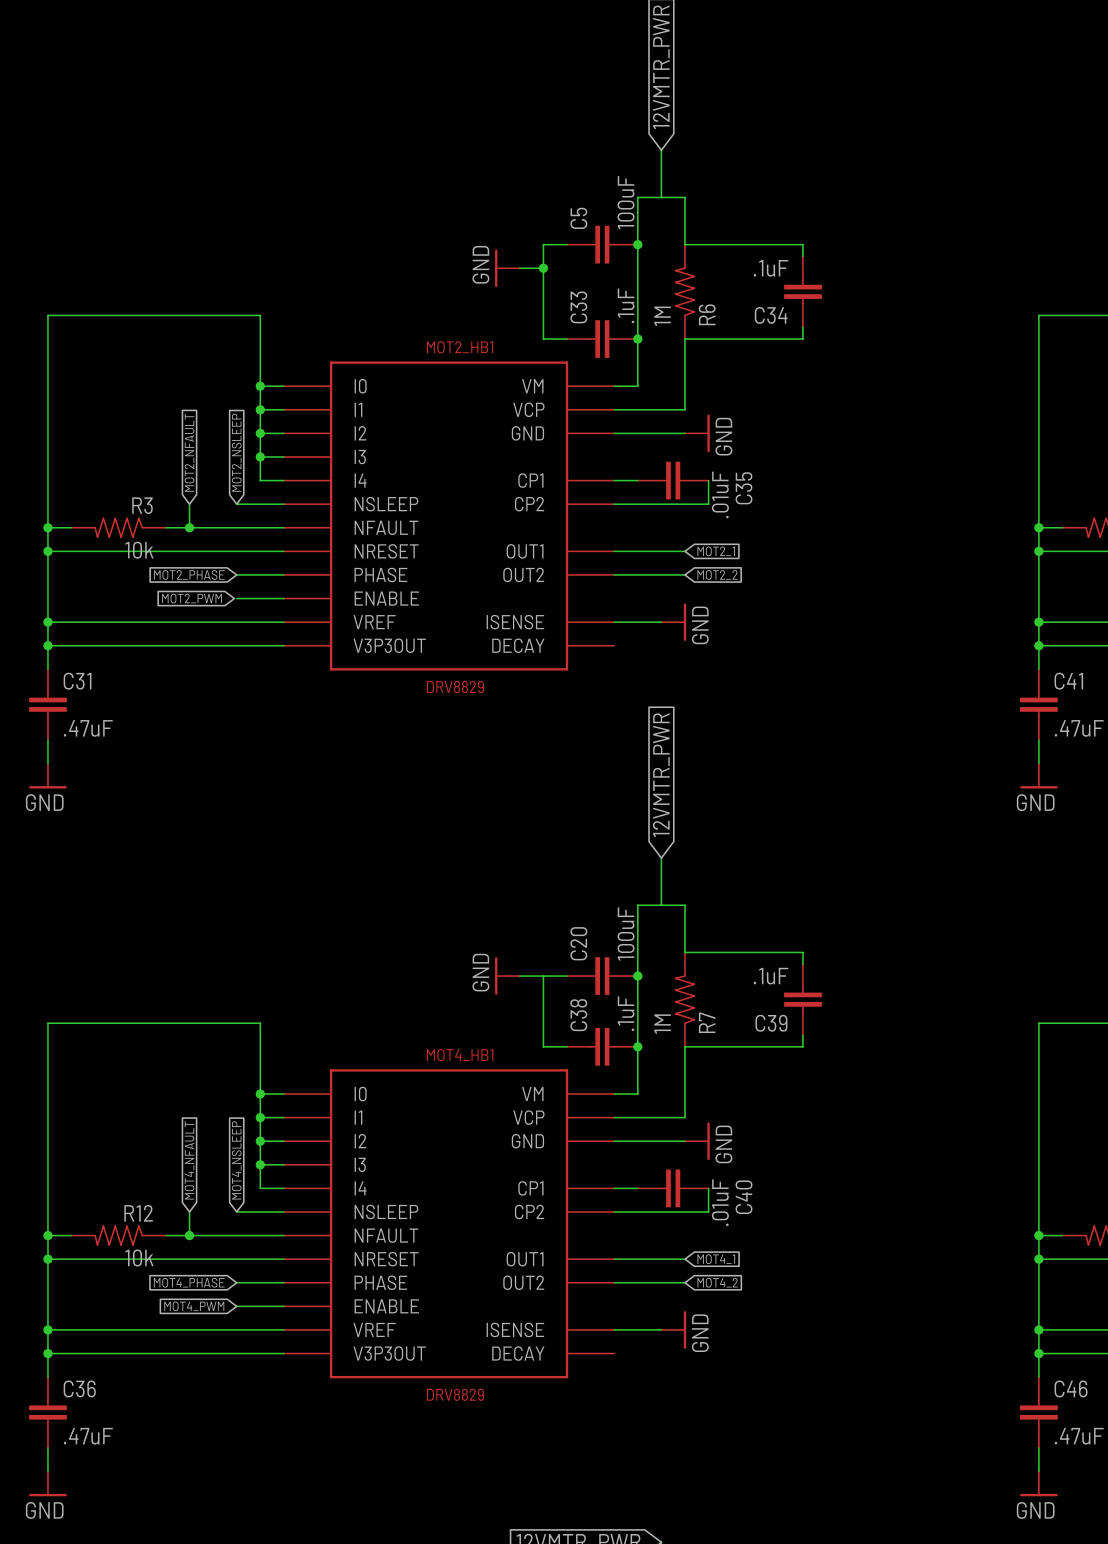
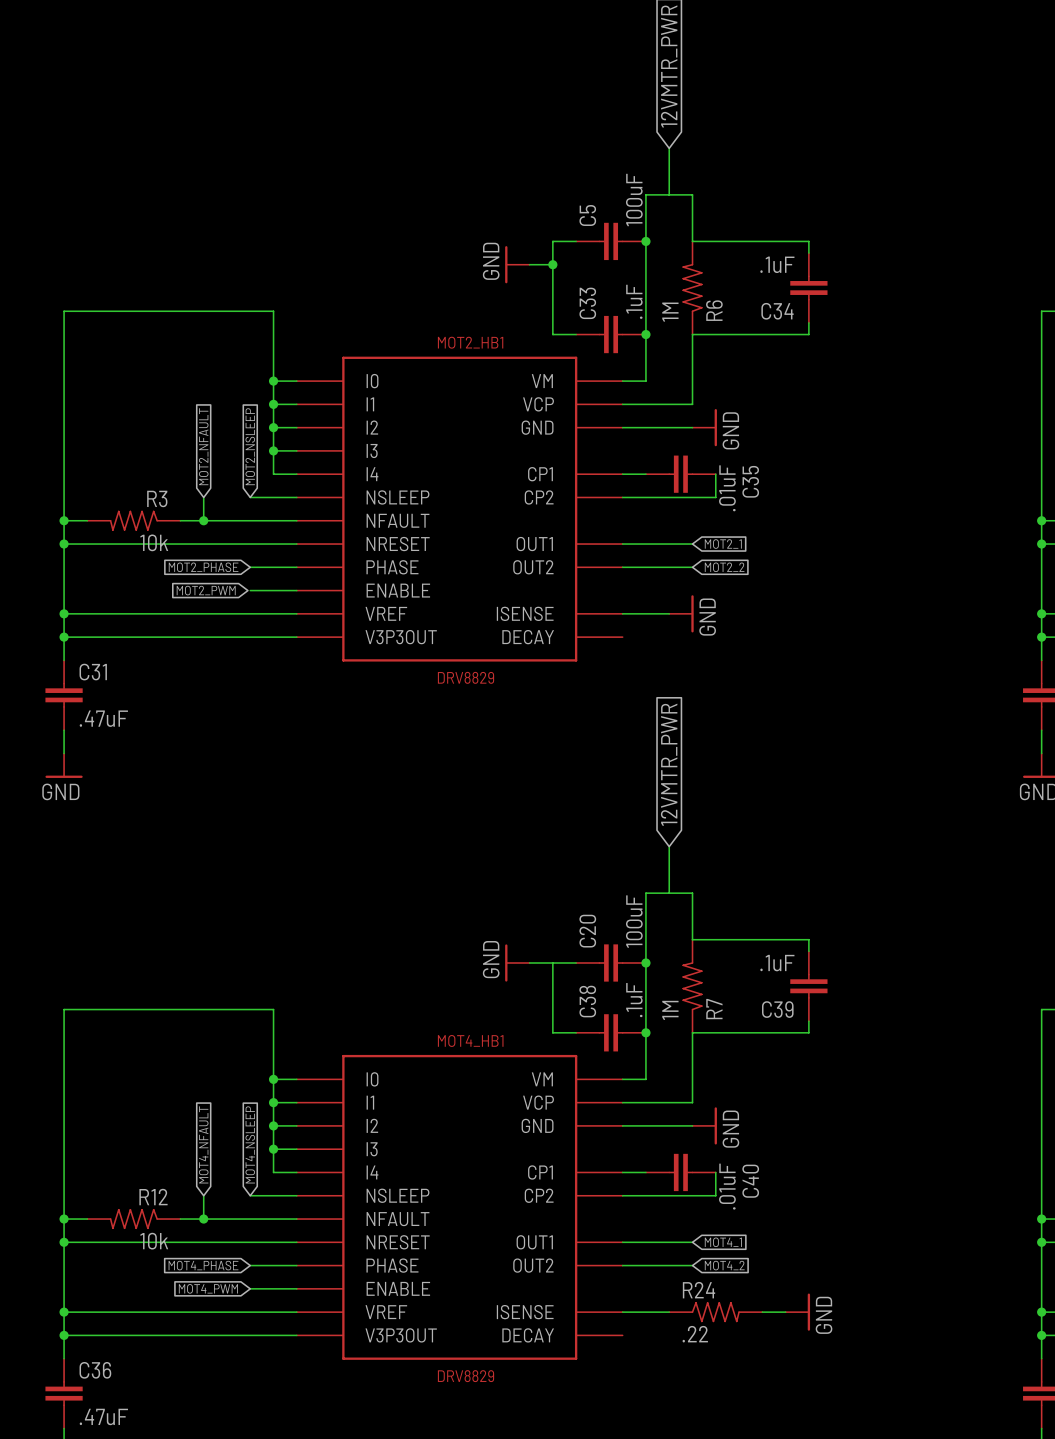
power symbol position: GND (673, 1329) -> GND (797, 1312)
R24: none -> .22 (715, 1312)
wire: none -> (762, 1312) (785, 1312)

